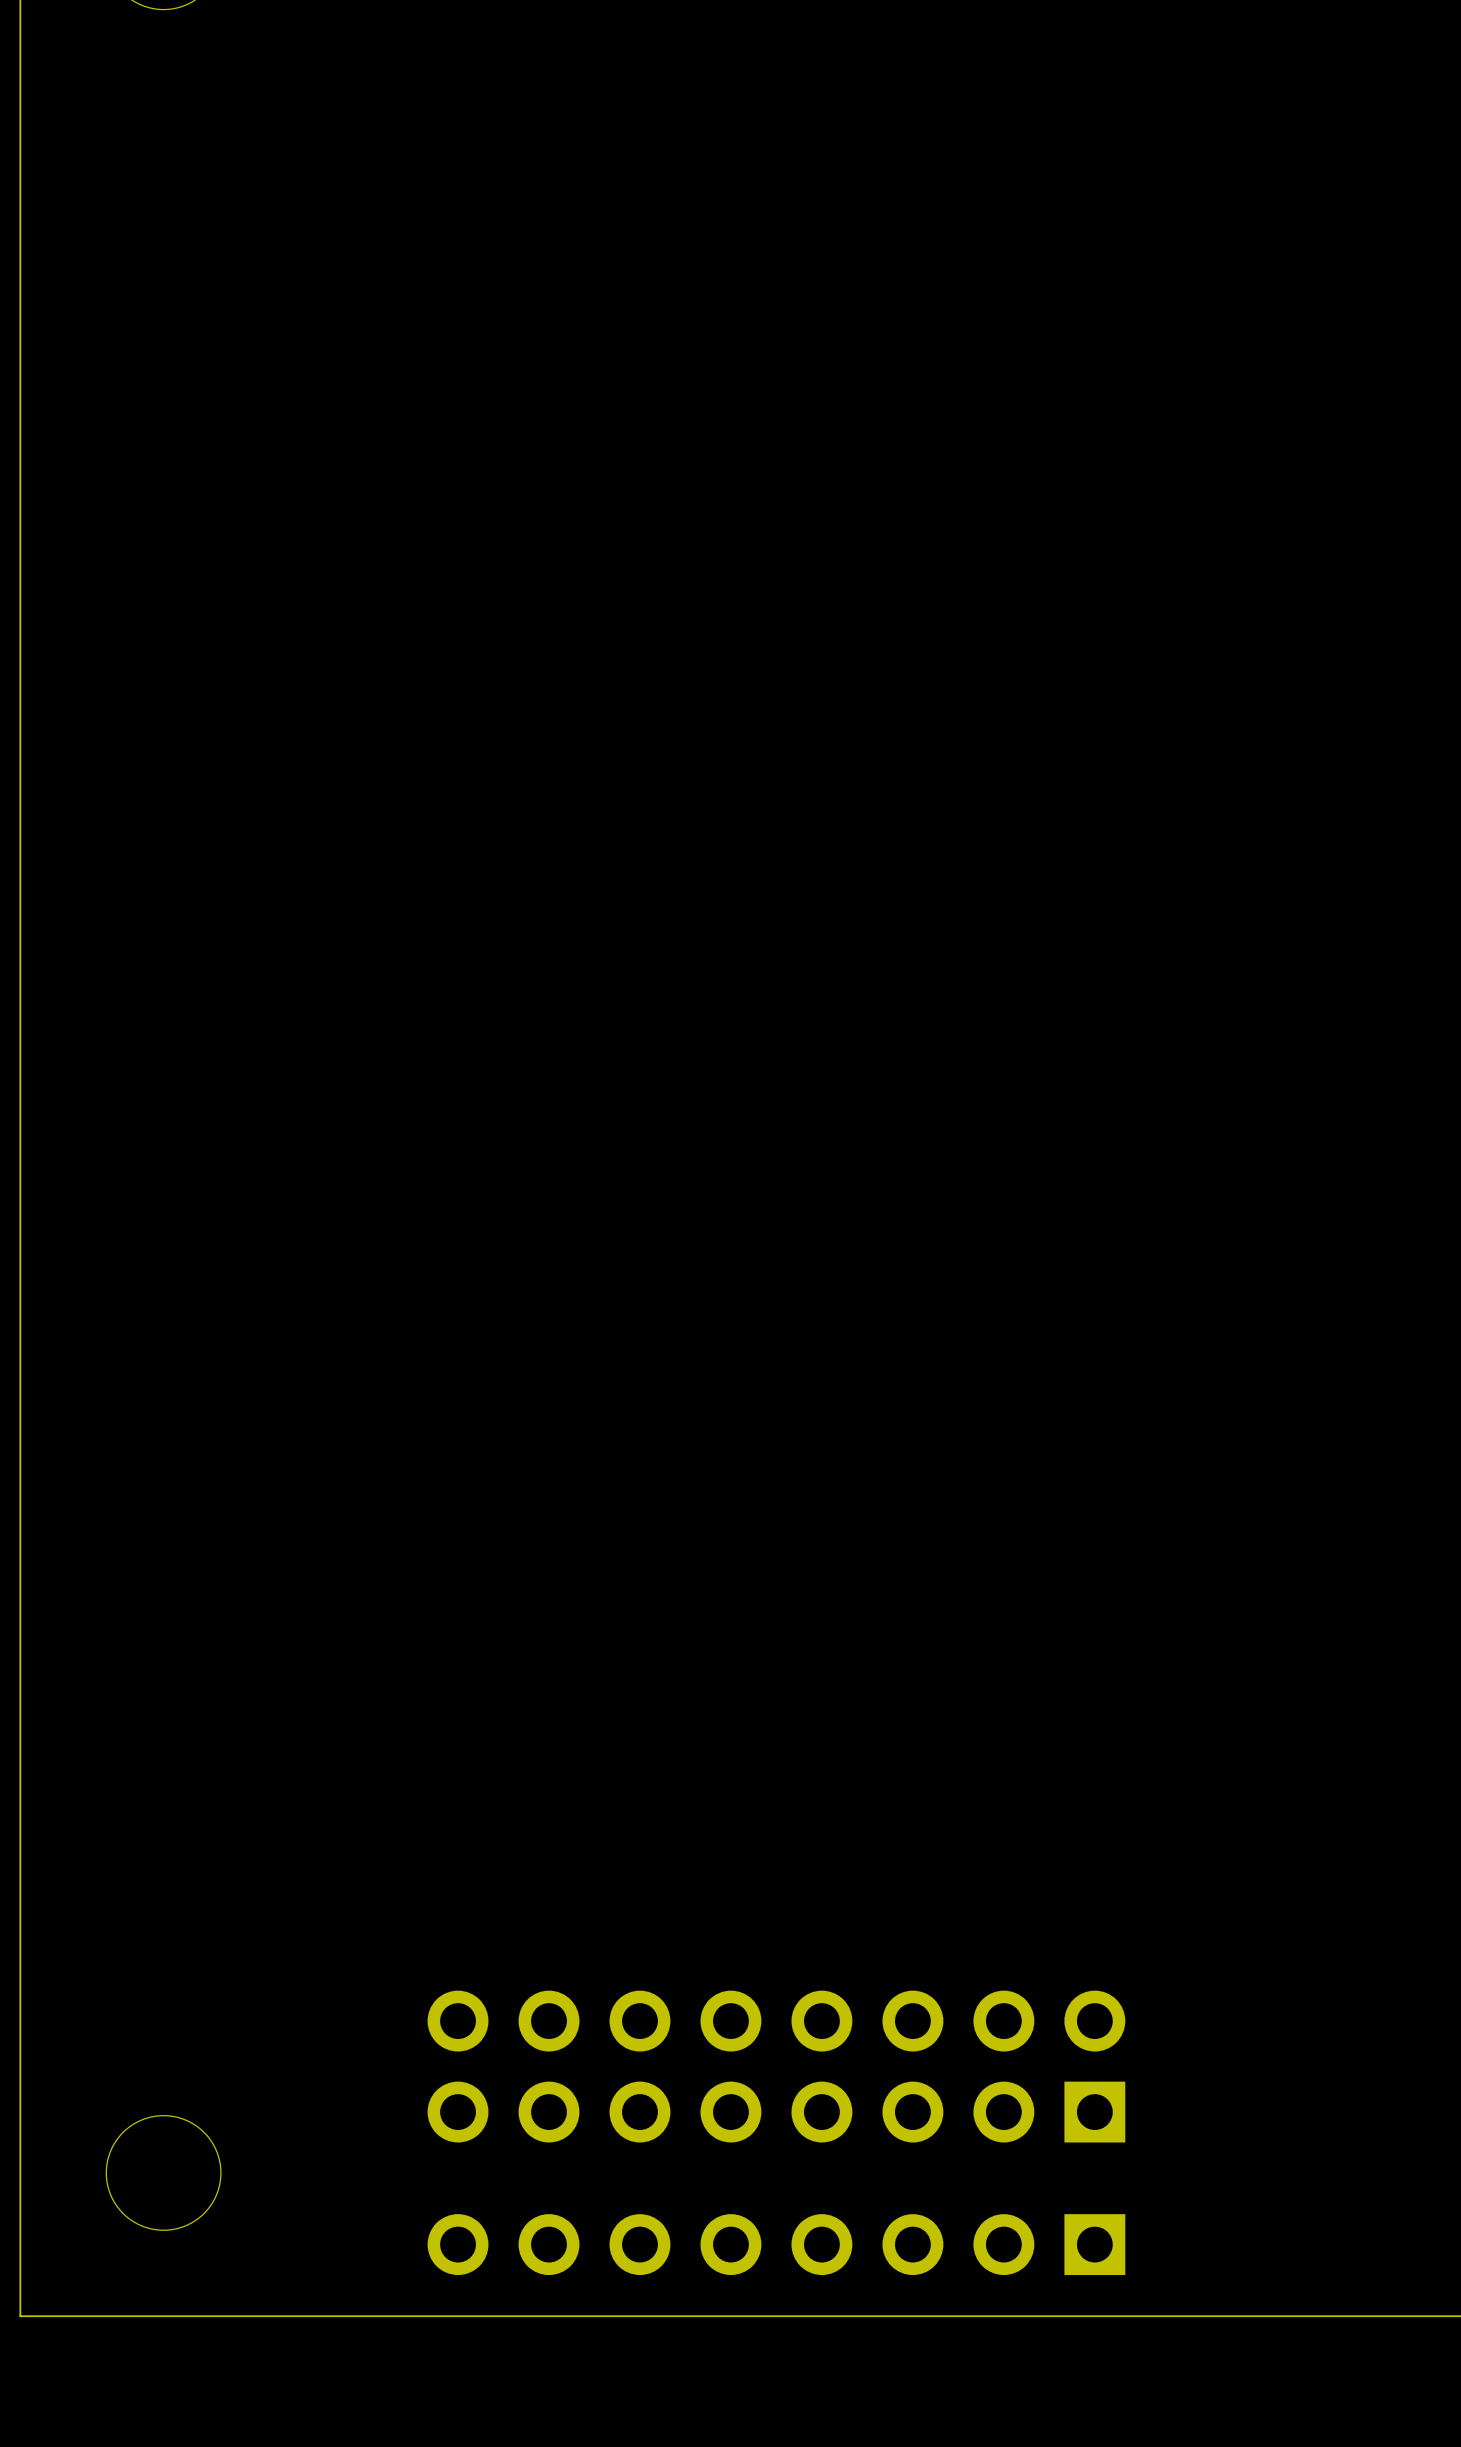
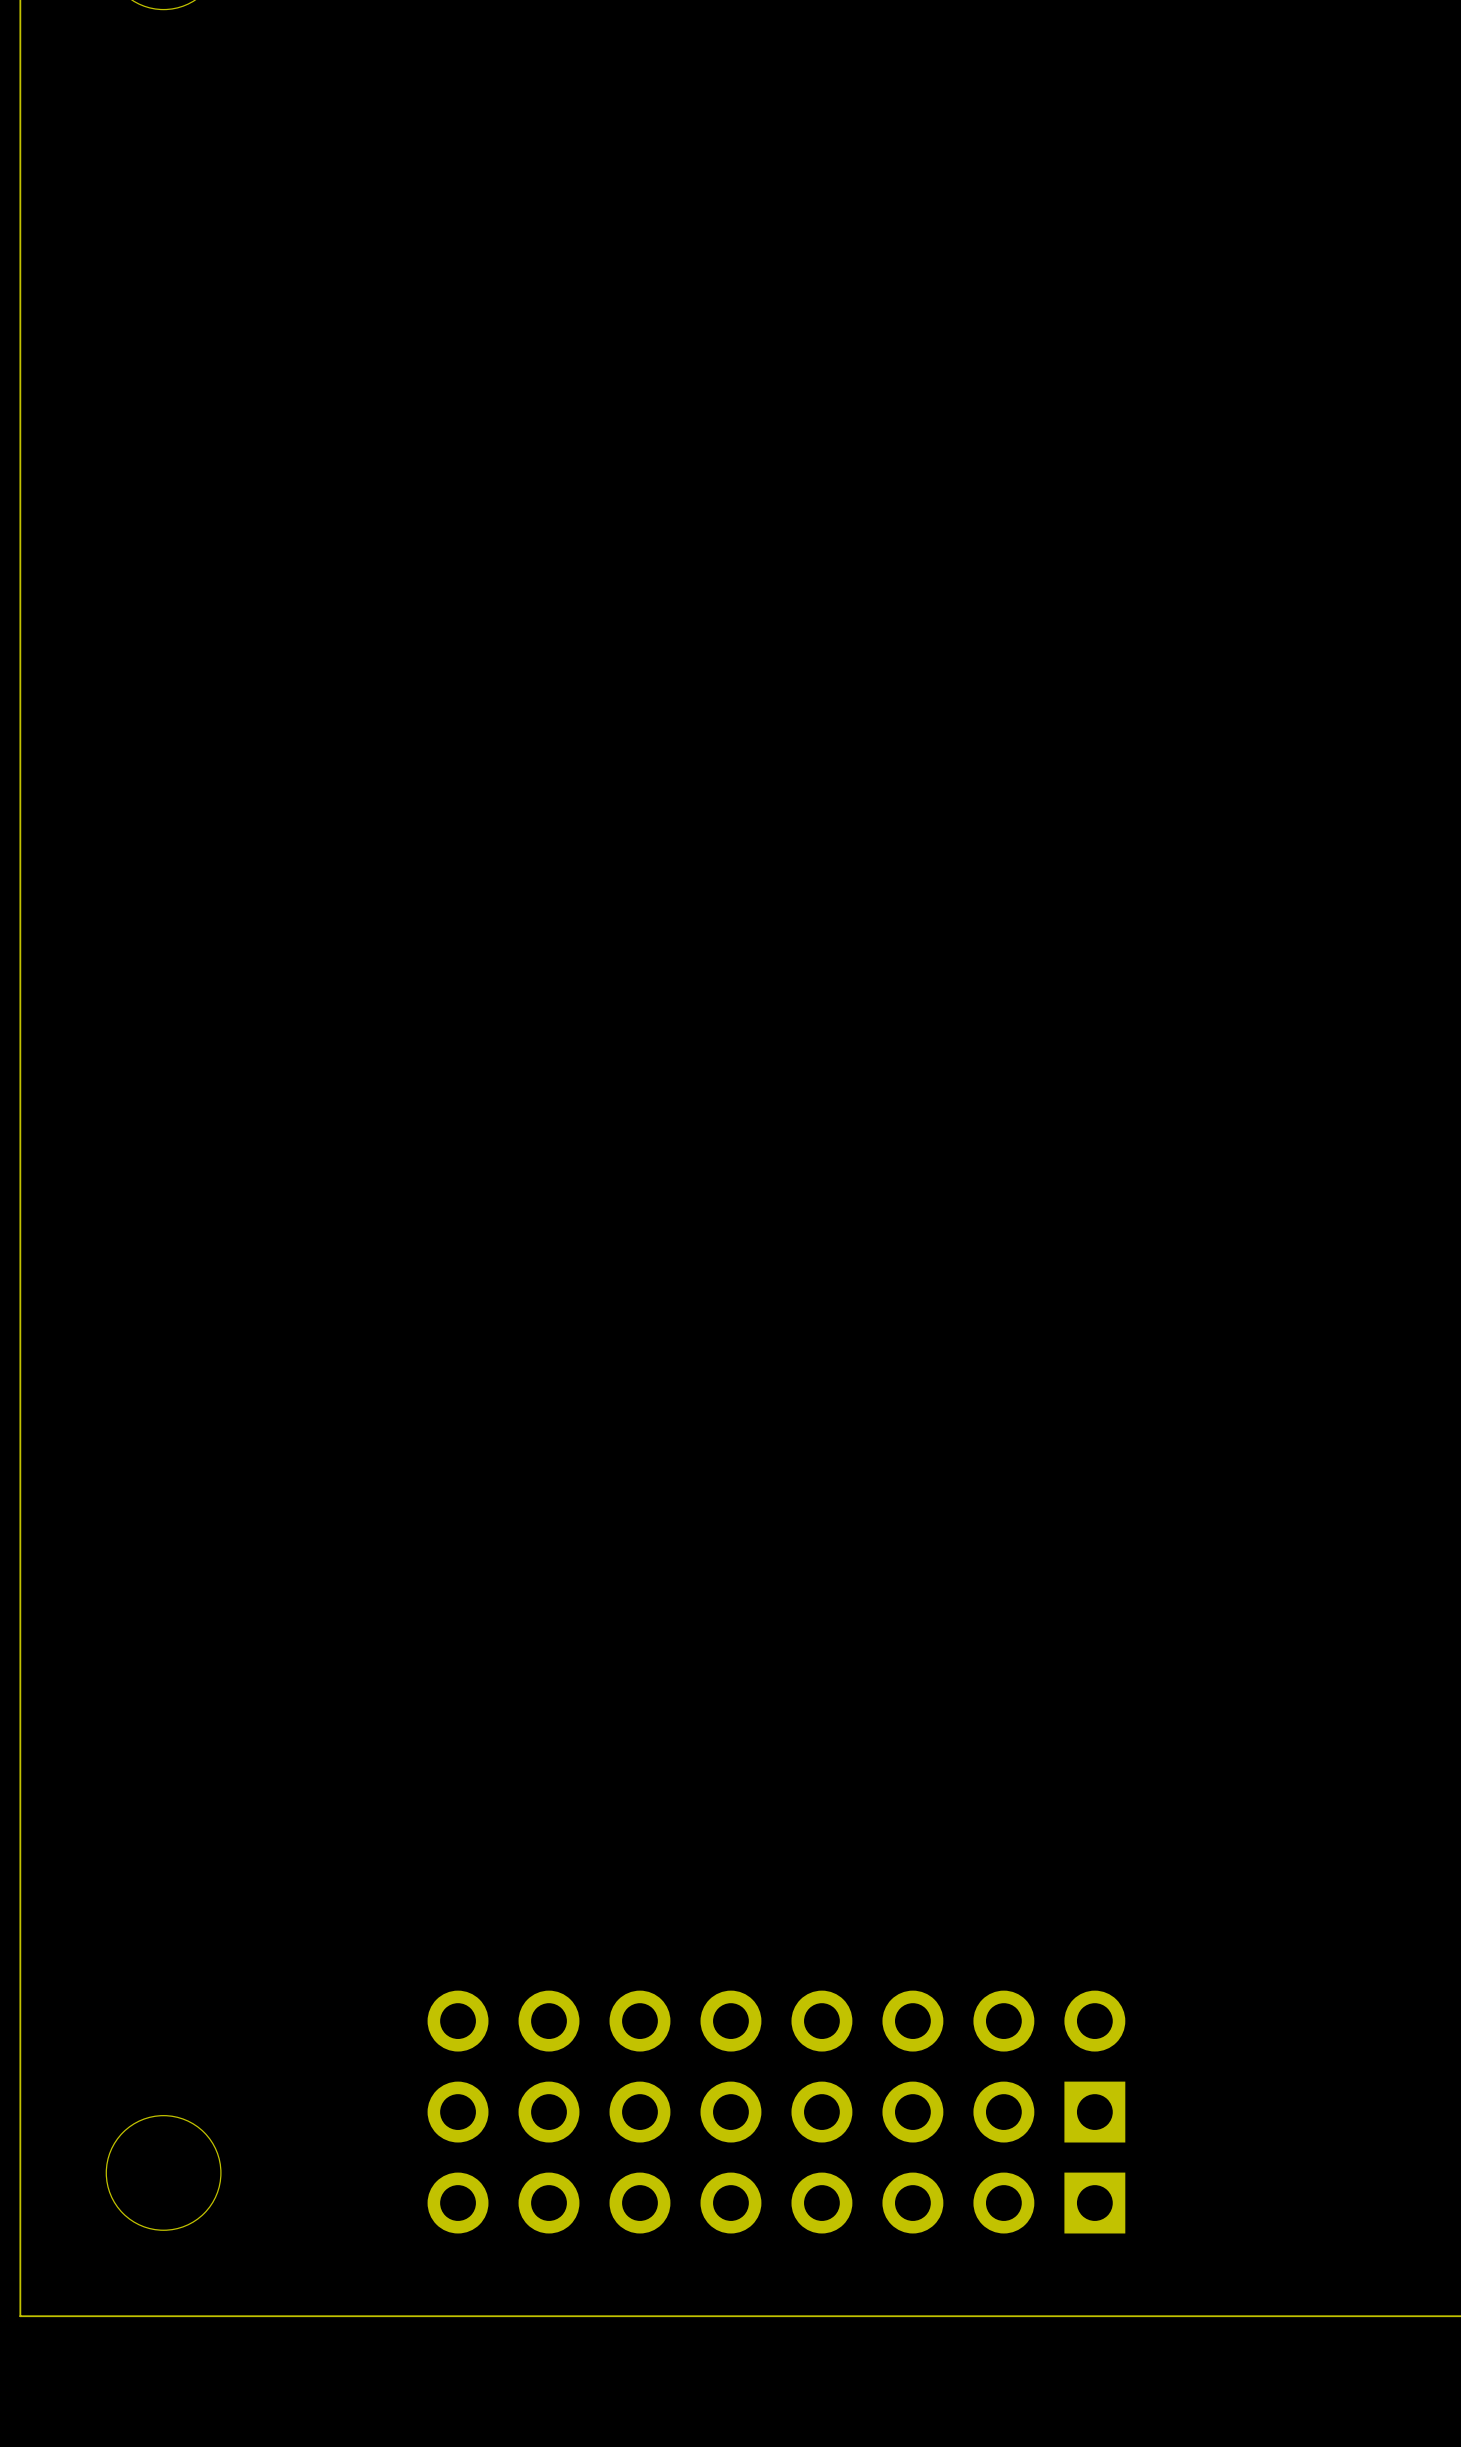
part position: (776, 2244) -> (776, 2203)

